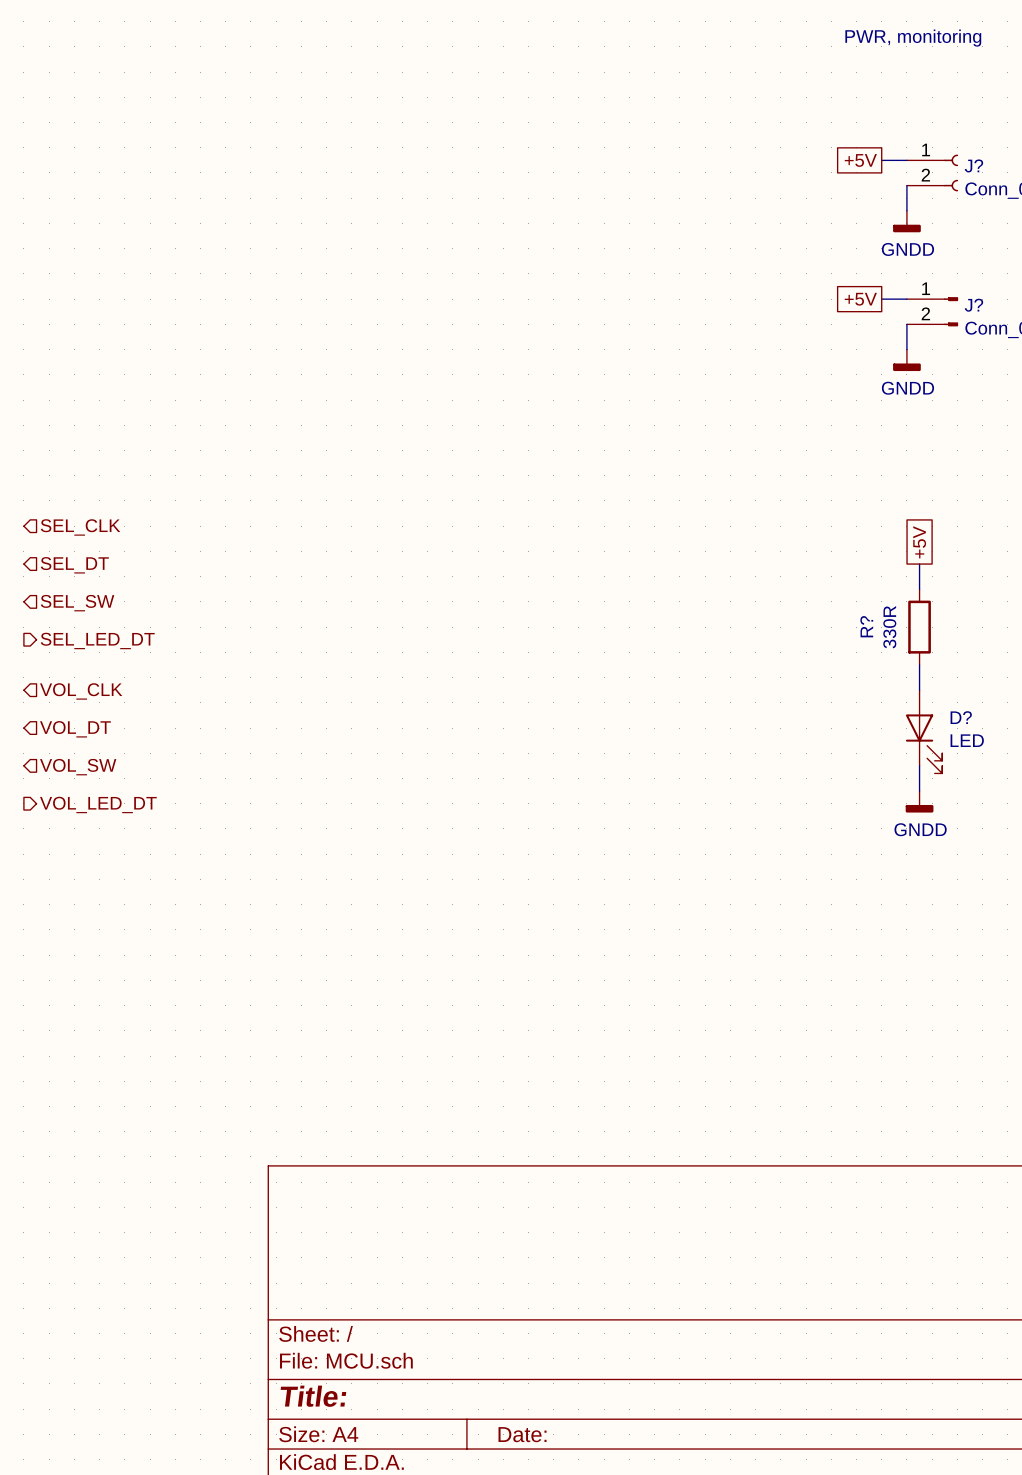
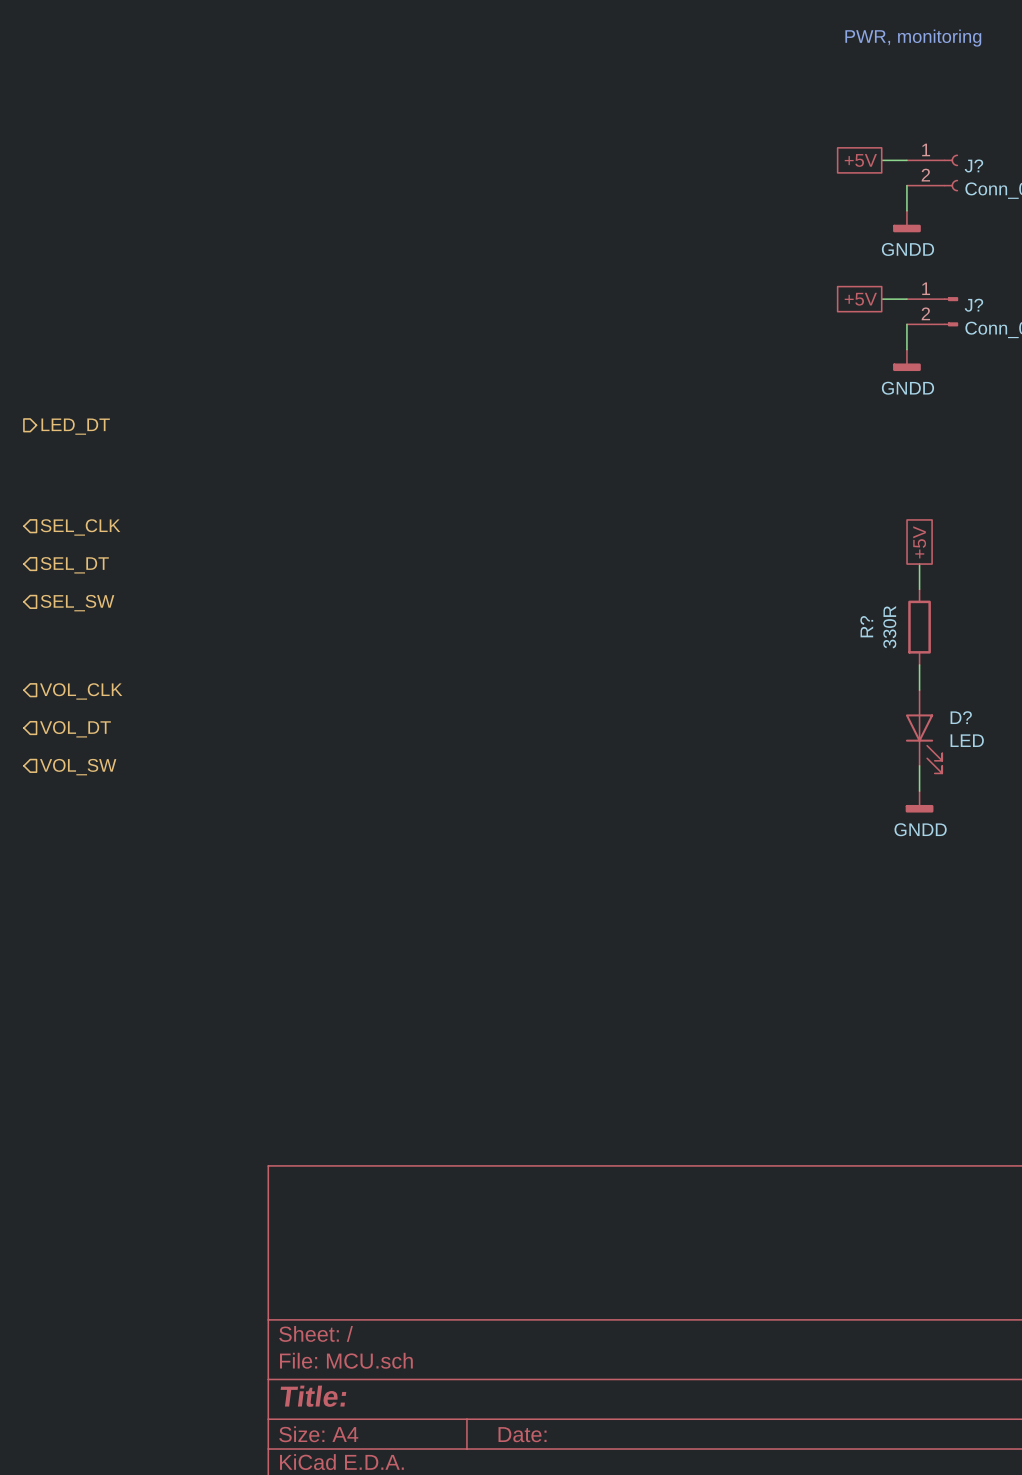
hierarchical label: none -> LED_DT (75, 426)
hierarchical label: SEL_LED_DT (97, 640) -> none
hierarchical label: VOL_LED_DT (98, 804) -> none

